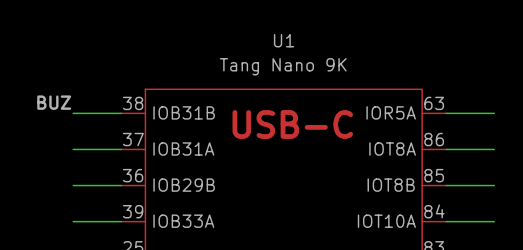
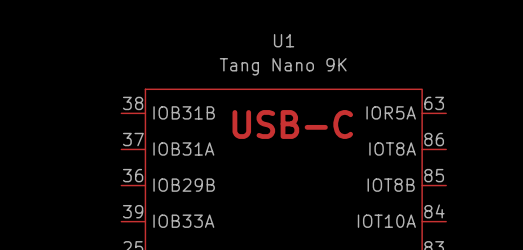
label: BUZ (54, 102) -> none
wire: (73, 113) (121, 113) -> none
wire: (446, 113) (494, 113) -> none
wire: (73, 149) (121, 149) -> none
wire: (446, 149) (494, 149) -> none
wire: (73, 185) (121, 185) -> none
wire: (446, 185) (494, 185) -> none
wire: (73, 221) (121, 221) -> none
wire: (446, 221) (494, 221) -> none

